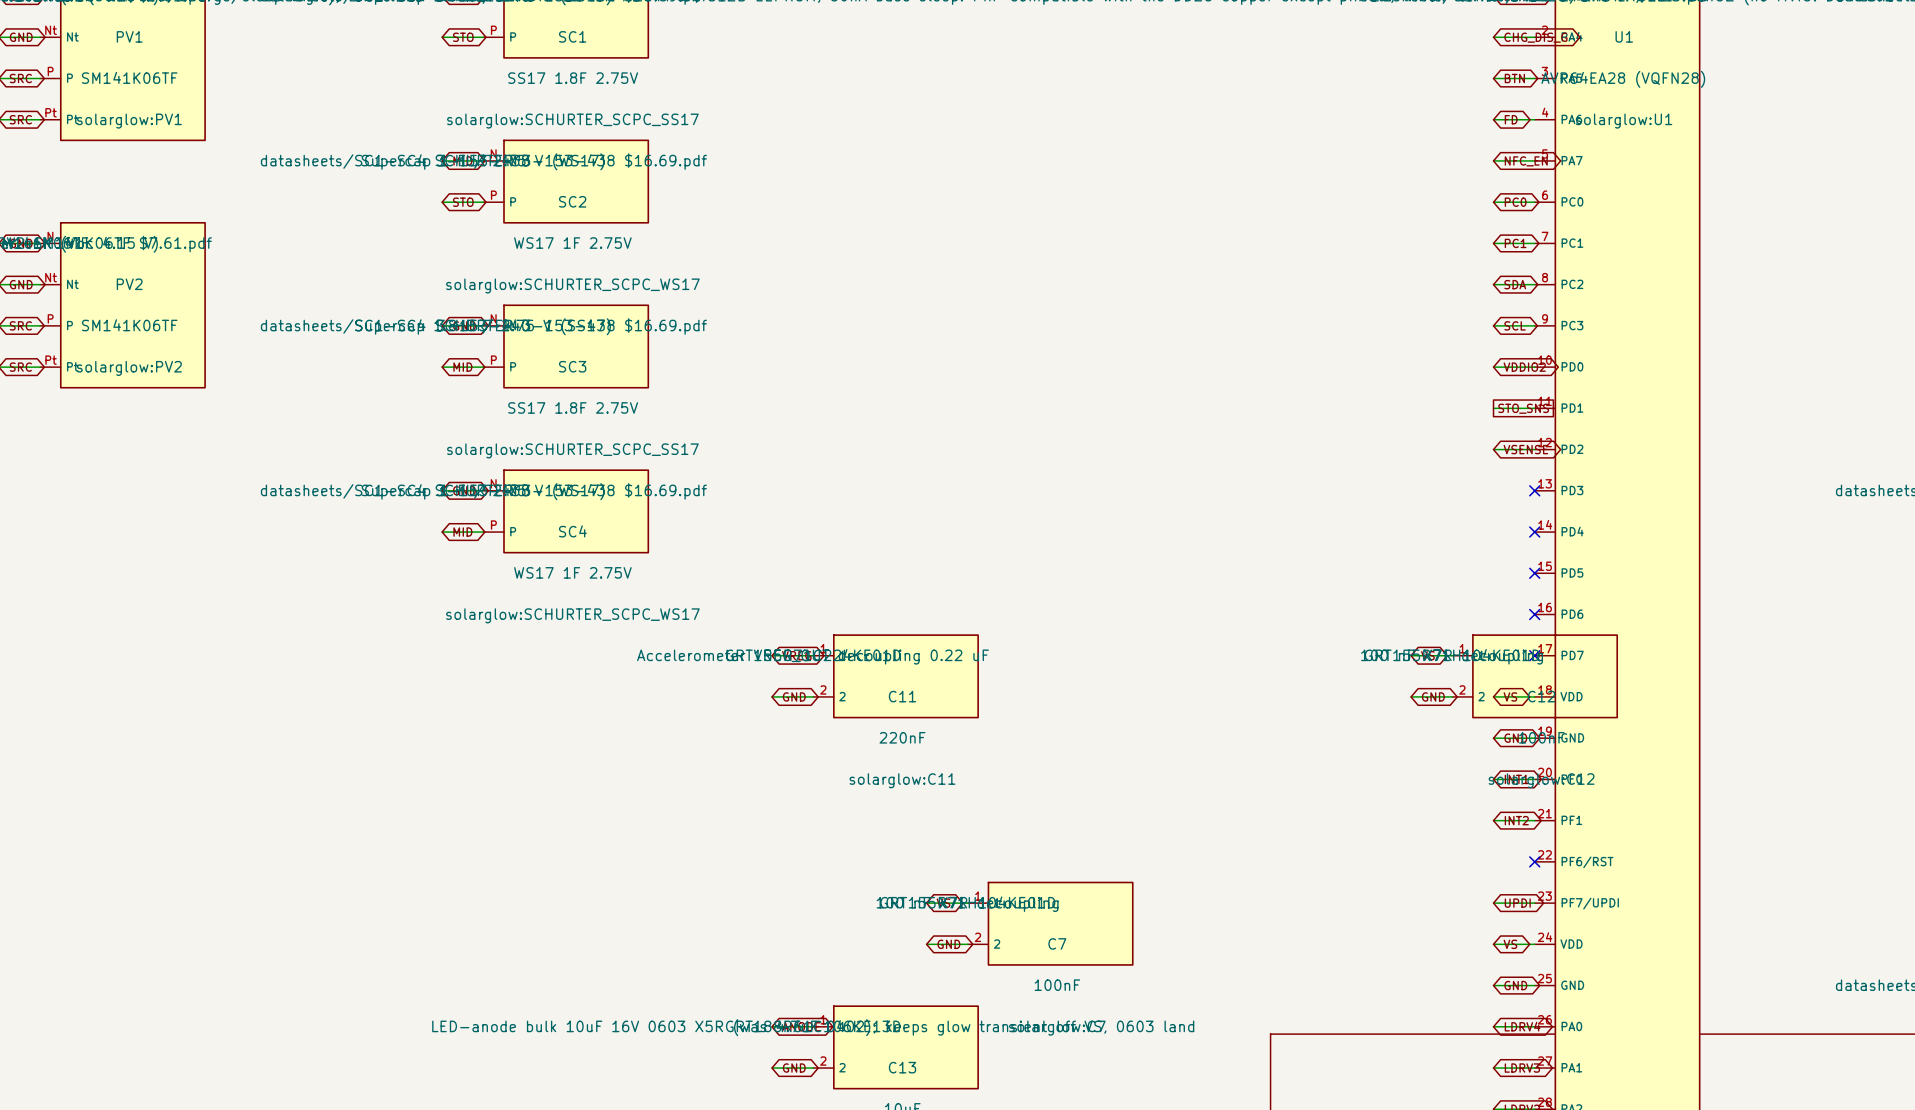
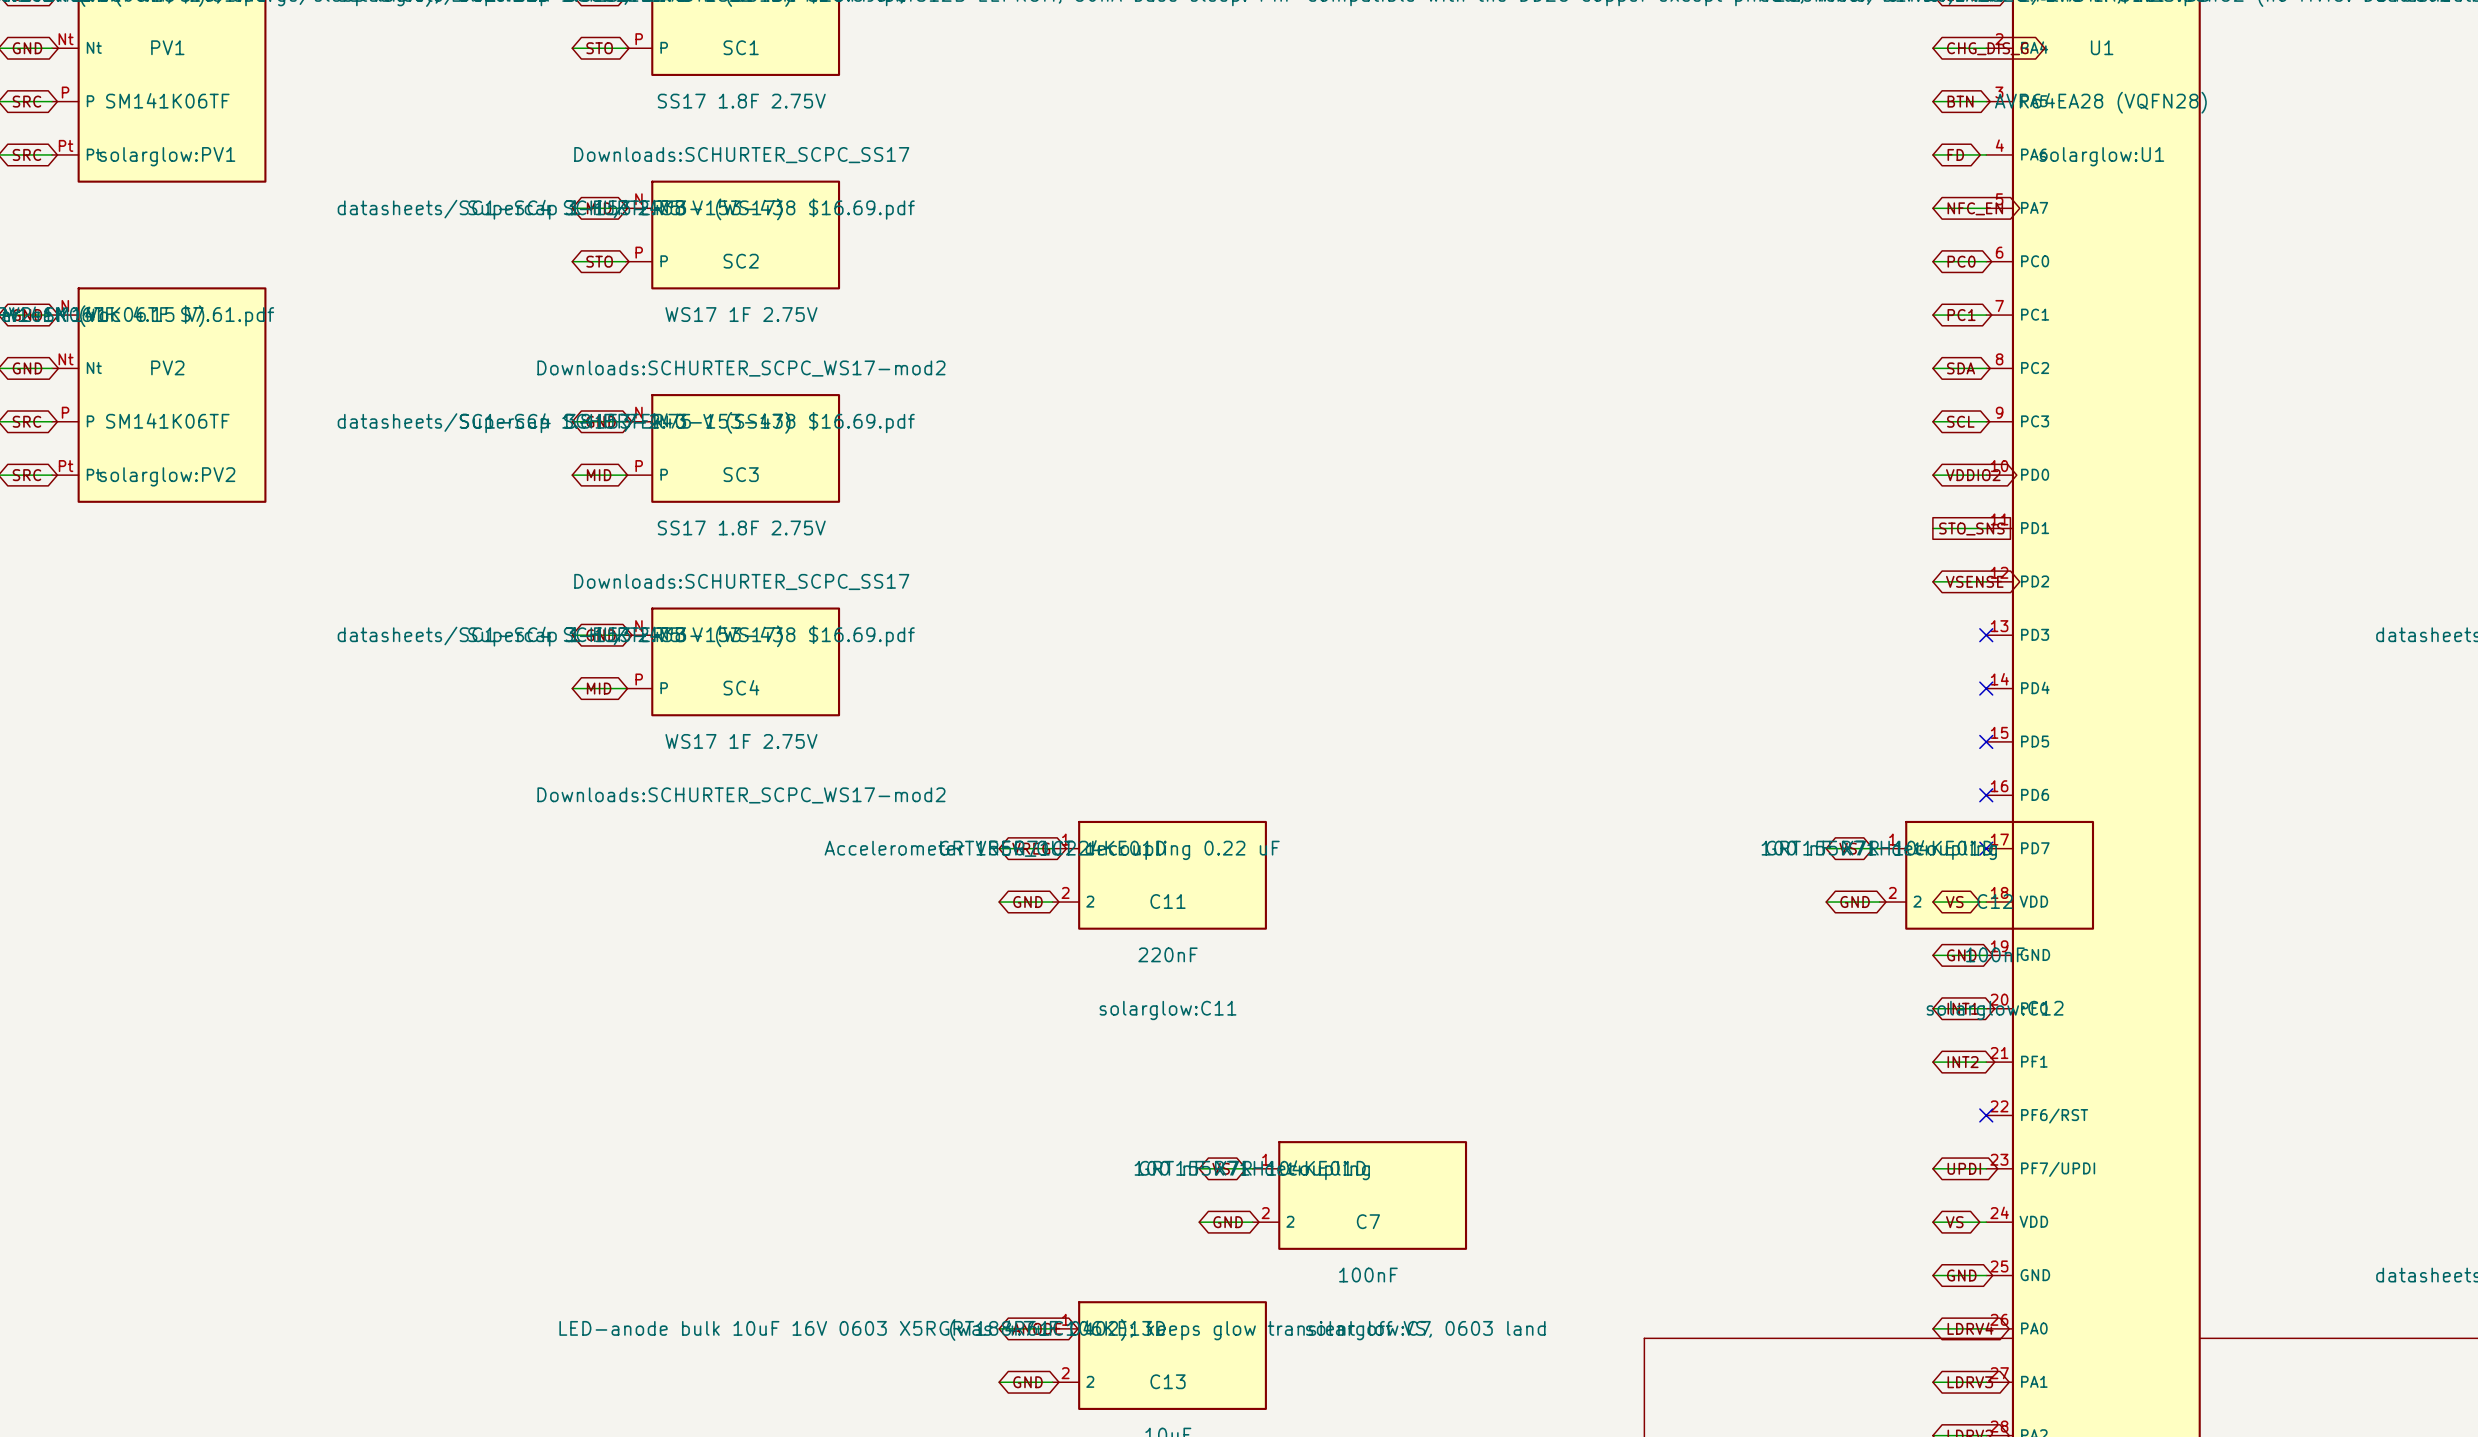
SC1 text: solarglow:SCHURTER_SCPC_SS17 (572, 121) -> Downloads:SCHURTER_SCPC_SS17 (741, 155)
SC2 text: solarglow:SCHURTER_SCPC_WS17 (572, 285) -> Downloads:SCHURTER_SCPC_WS17-mod2 (741, 368)
SC3 text: solarglow:SCHURTER_SCPC_SS17 (572, 450) -> Downloads:SCHURTER_SCPC_SS17 (741, 581)
SC4 text: solarglow:SCHURTER_SCPC_WS17 (572, 615) -> Downloads:SCHURTER_SCPC_WS17-mod2 (741, 795)

